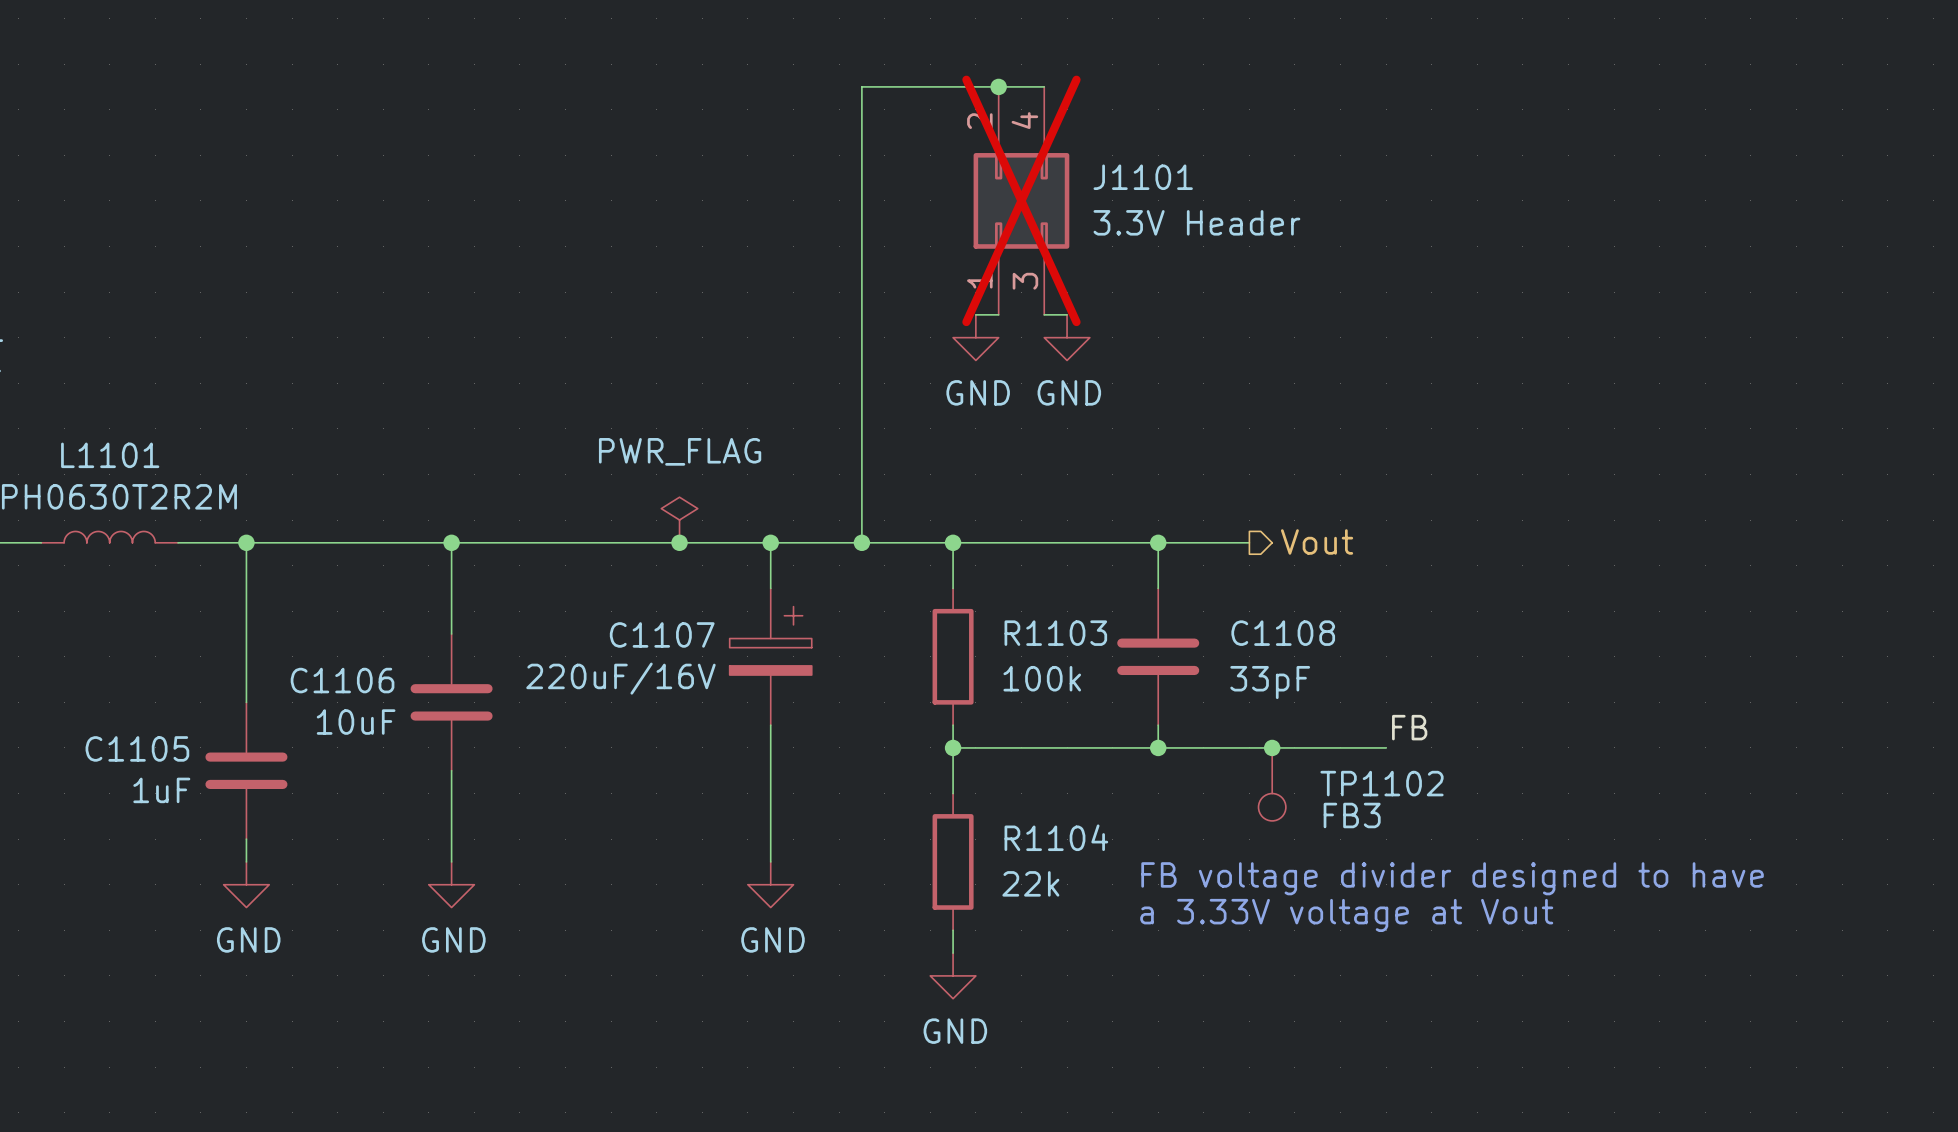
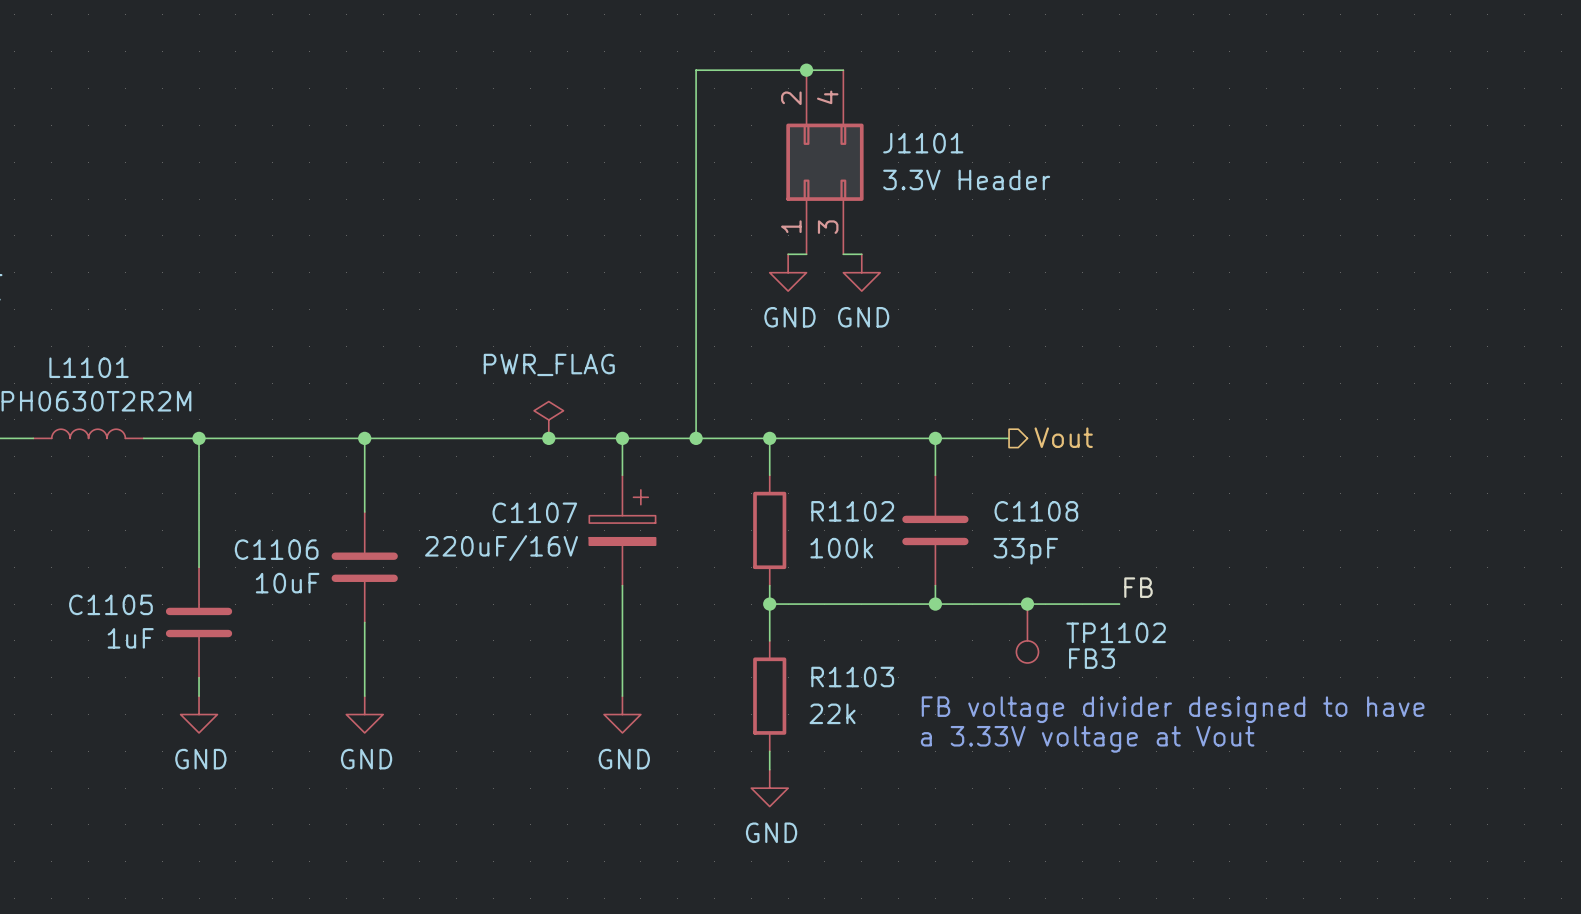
J1101 do-not-place cross: (1021, 200) -> none
R1103 name: R1103 (1055, 633) -> R1102 (852, 511)
R1104 name: R1104 (1056, 837) -> R1103 (852, 677)

